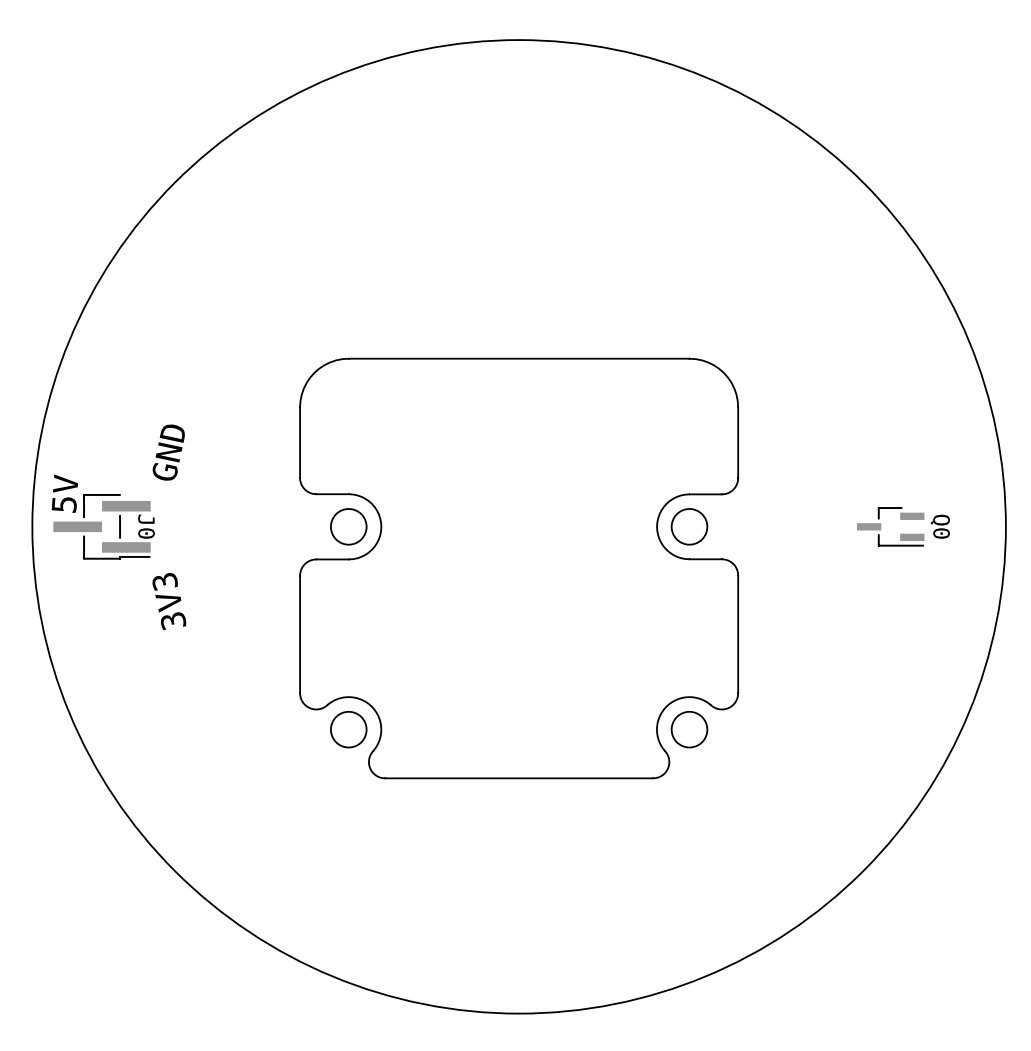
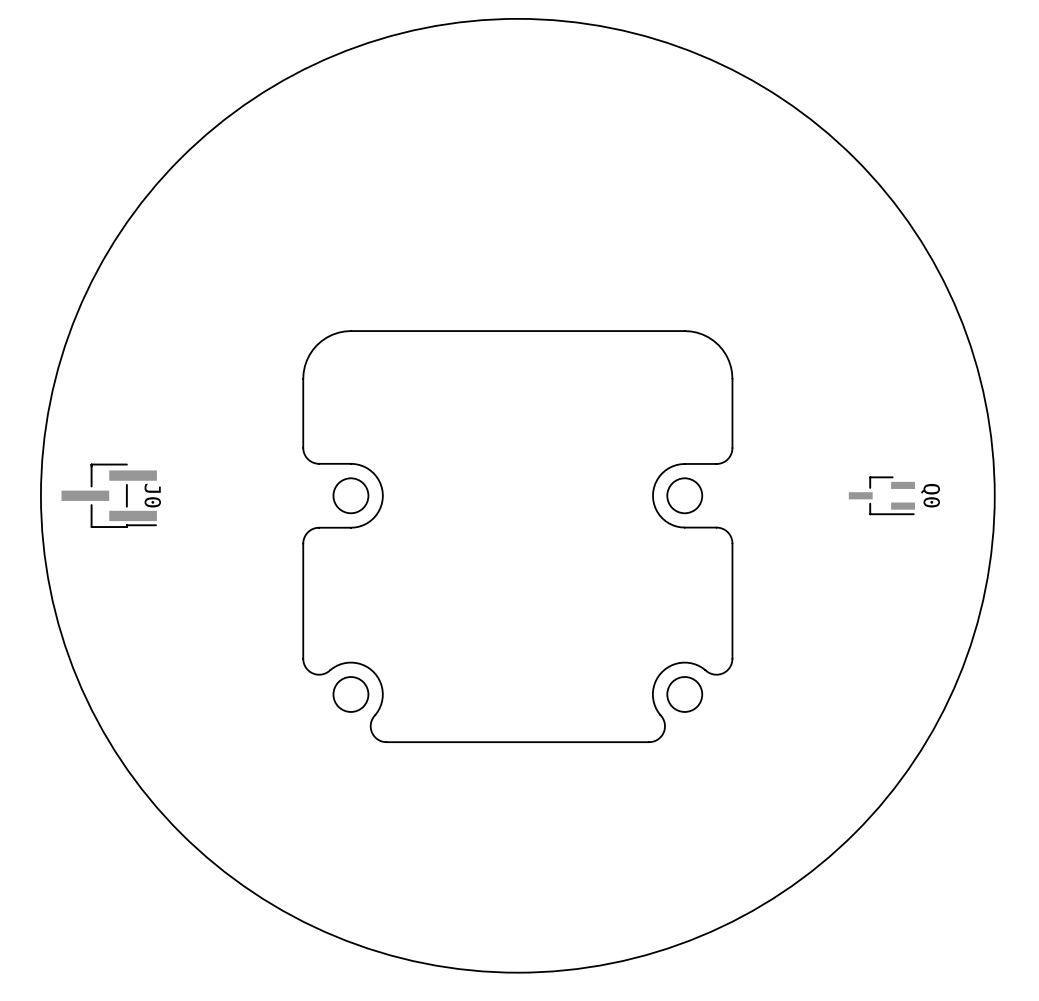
text: GND (168, 452) -> none
text: 5V (64, 493) -> none
text: 3V3 (169, 601) -> none

